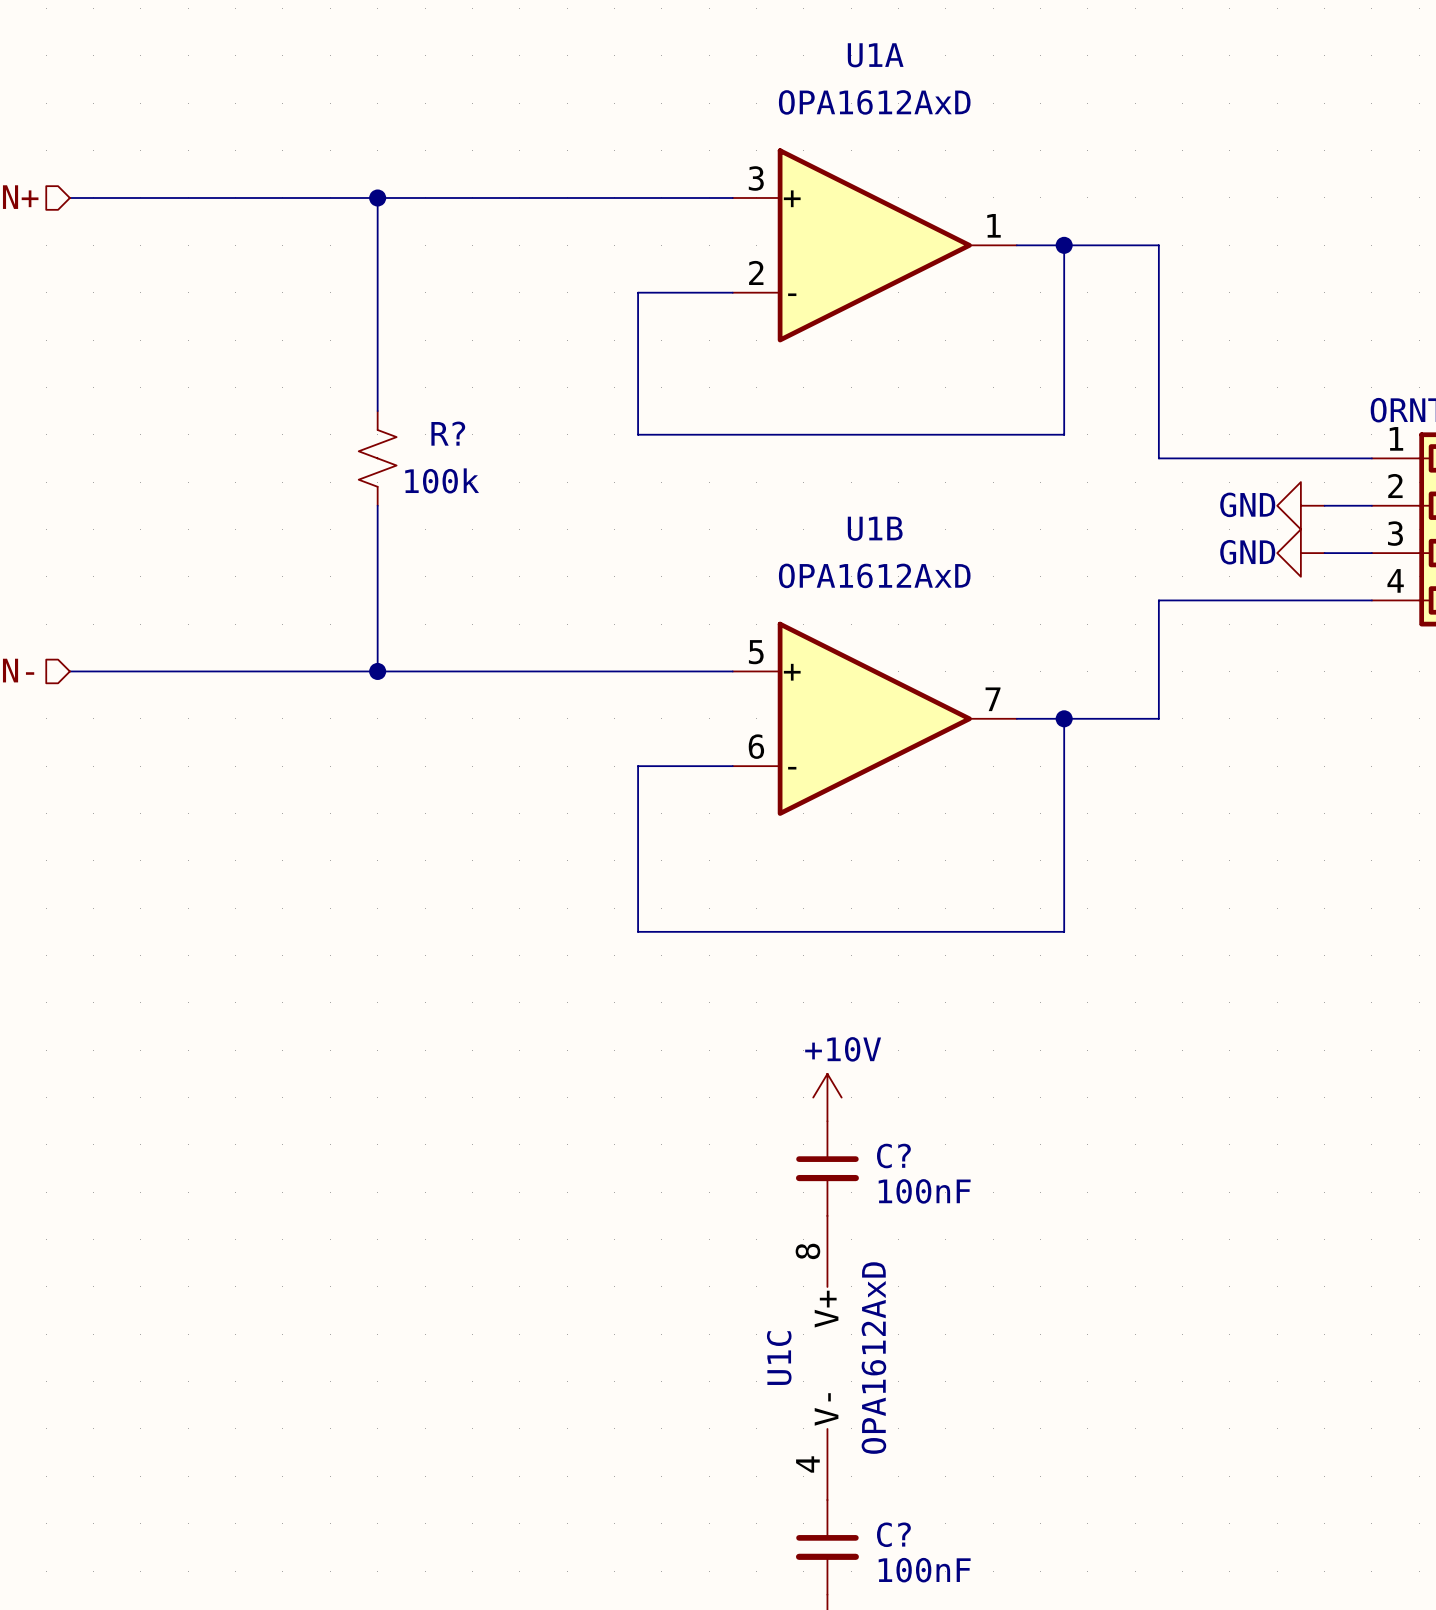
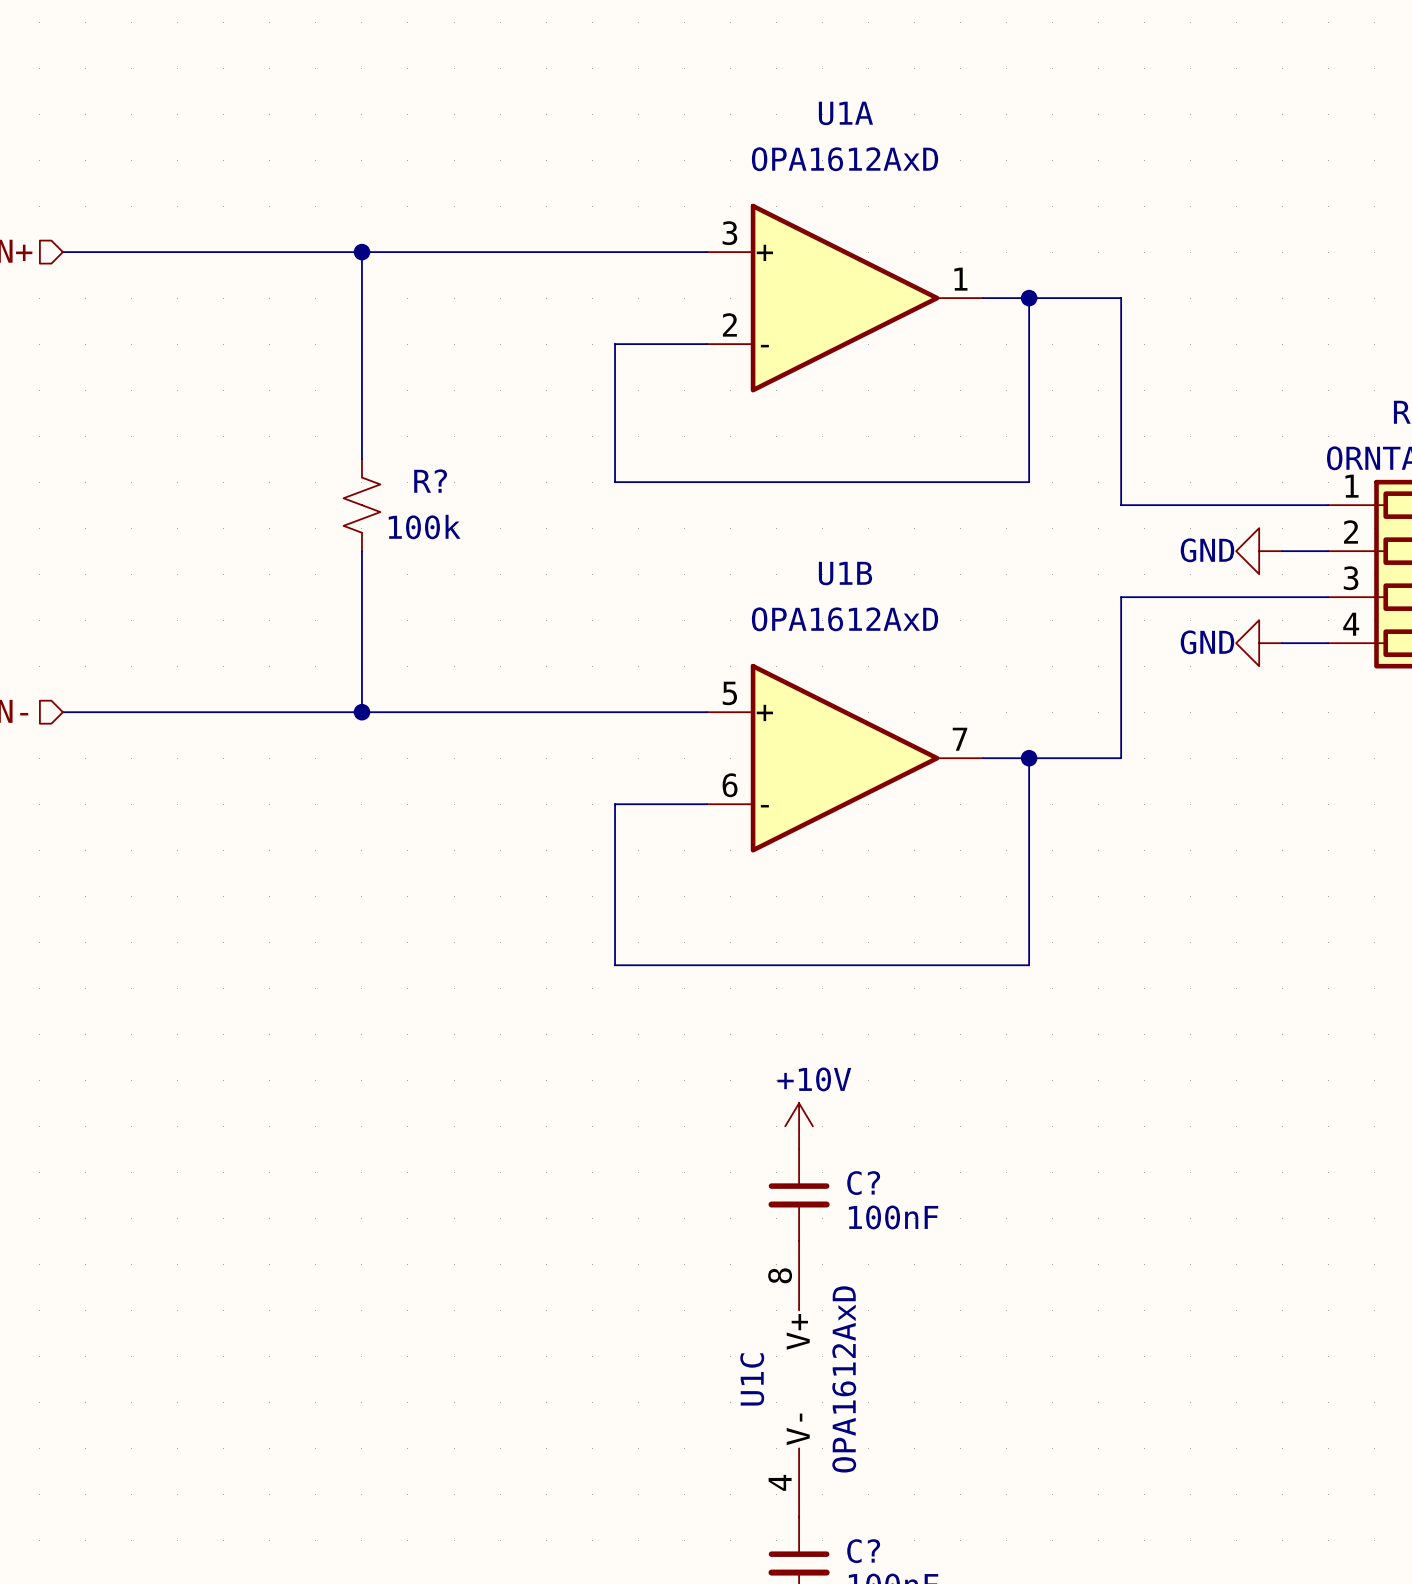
power symbol position: GND (1300, 553) -> GND (1259, 643)
wire: (1158, 600) (1324, 600) -> (1121, 643) (1121, 597) (1282, 597)

